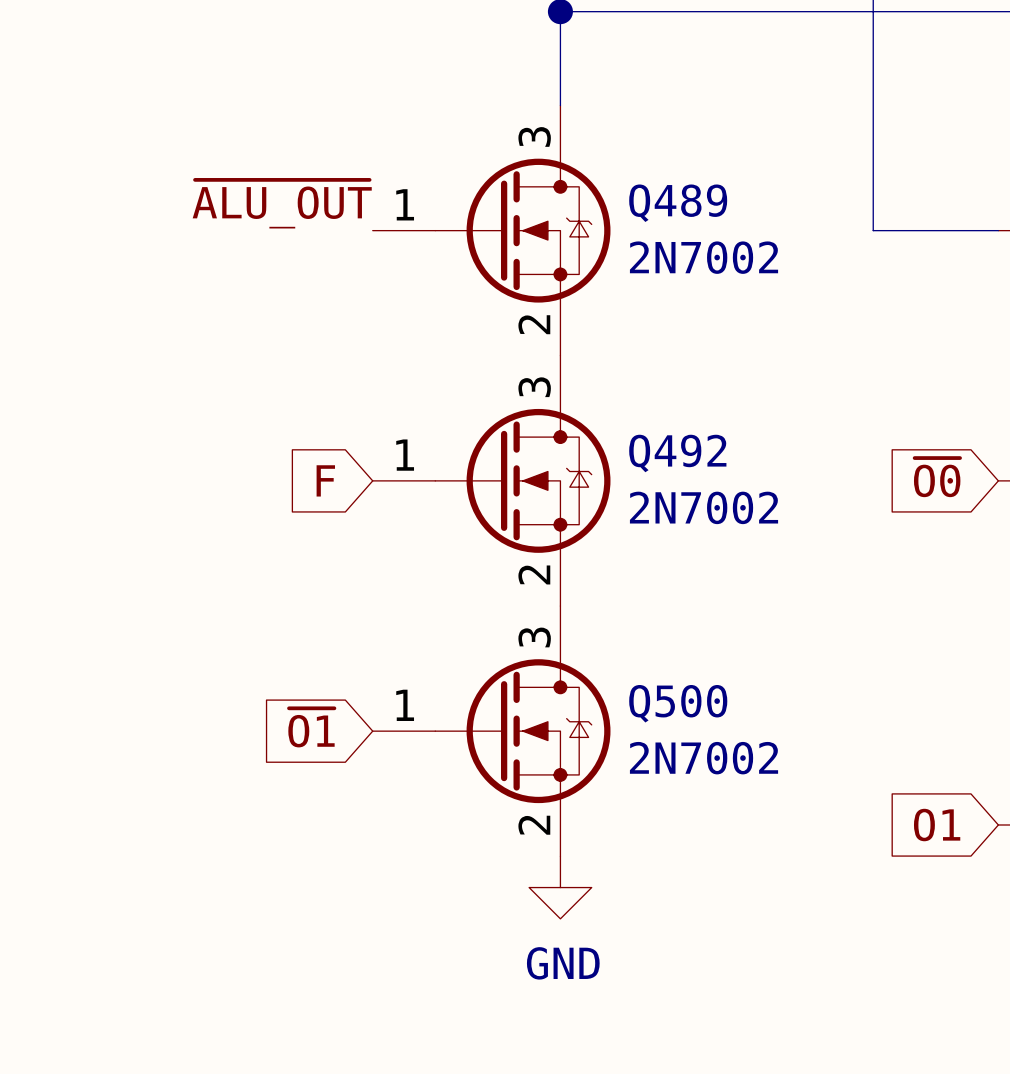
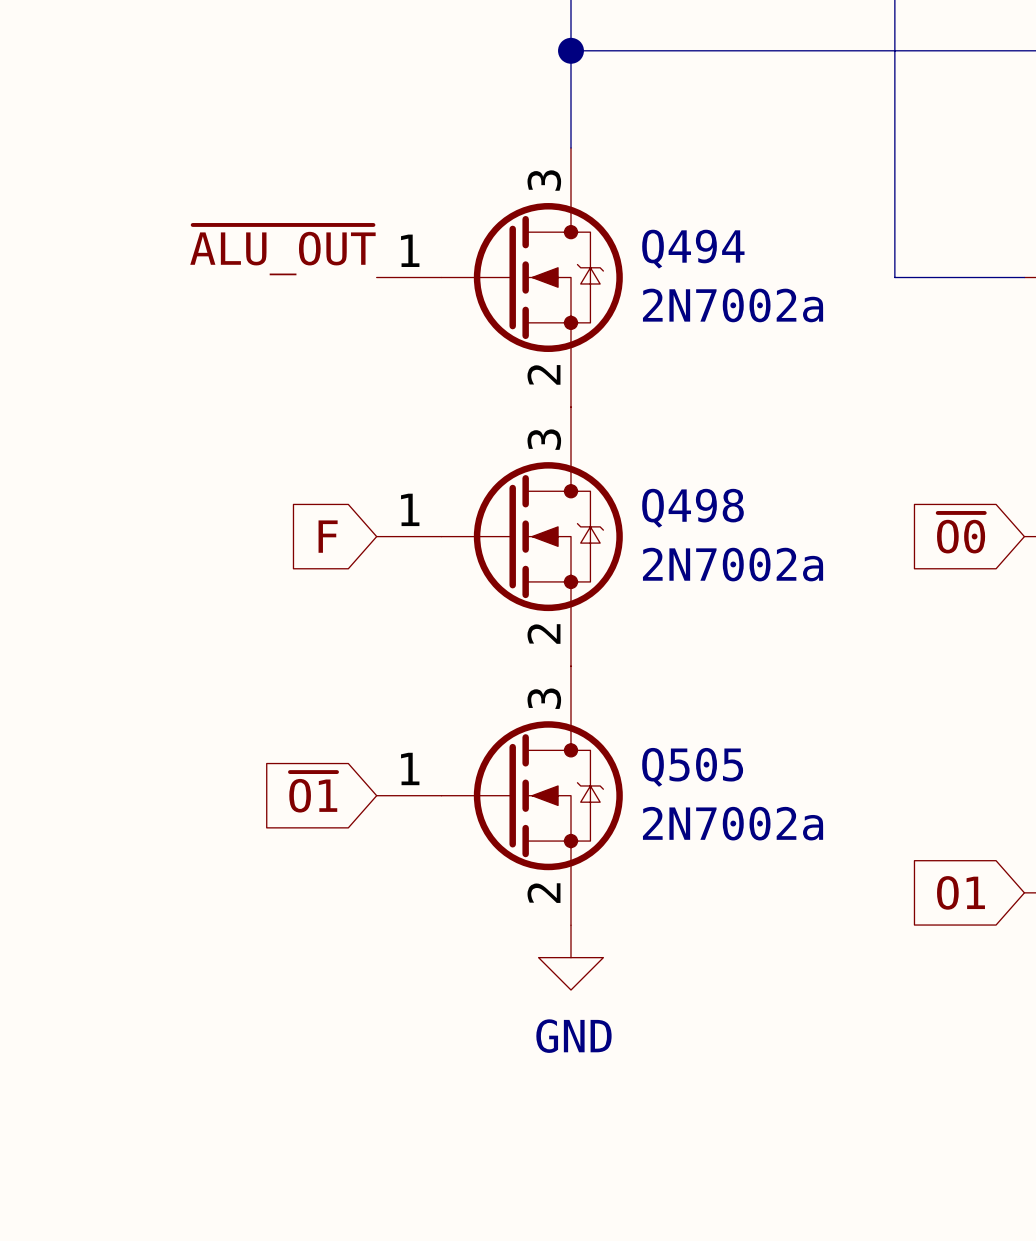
Q489 name: Q489 (678, 203) -> Q494 (693, 249)
Q489 value: 2N7002 (704, 257) -> 2N7002a (733, 305)
Q492 name: Q492 (677, 453) -> Q498 (693, 508)
Q492 value: 2N7002 (704, 507) -> 2N7002a (733, 564)
Q500 name: Q500 (678, 703) -> Q505 (692, 767)
Q500 value: 2N7002 (704, 758) -> 2N7002a (733, 823)

